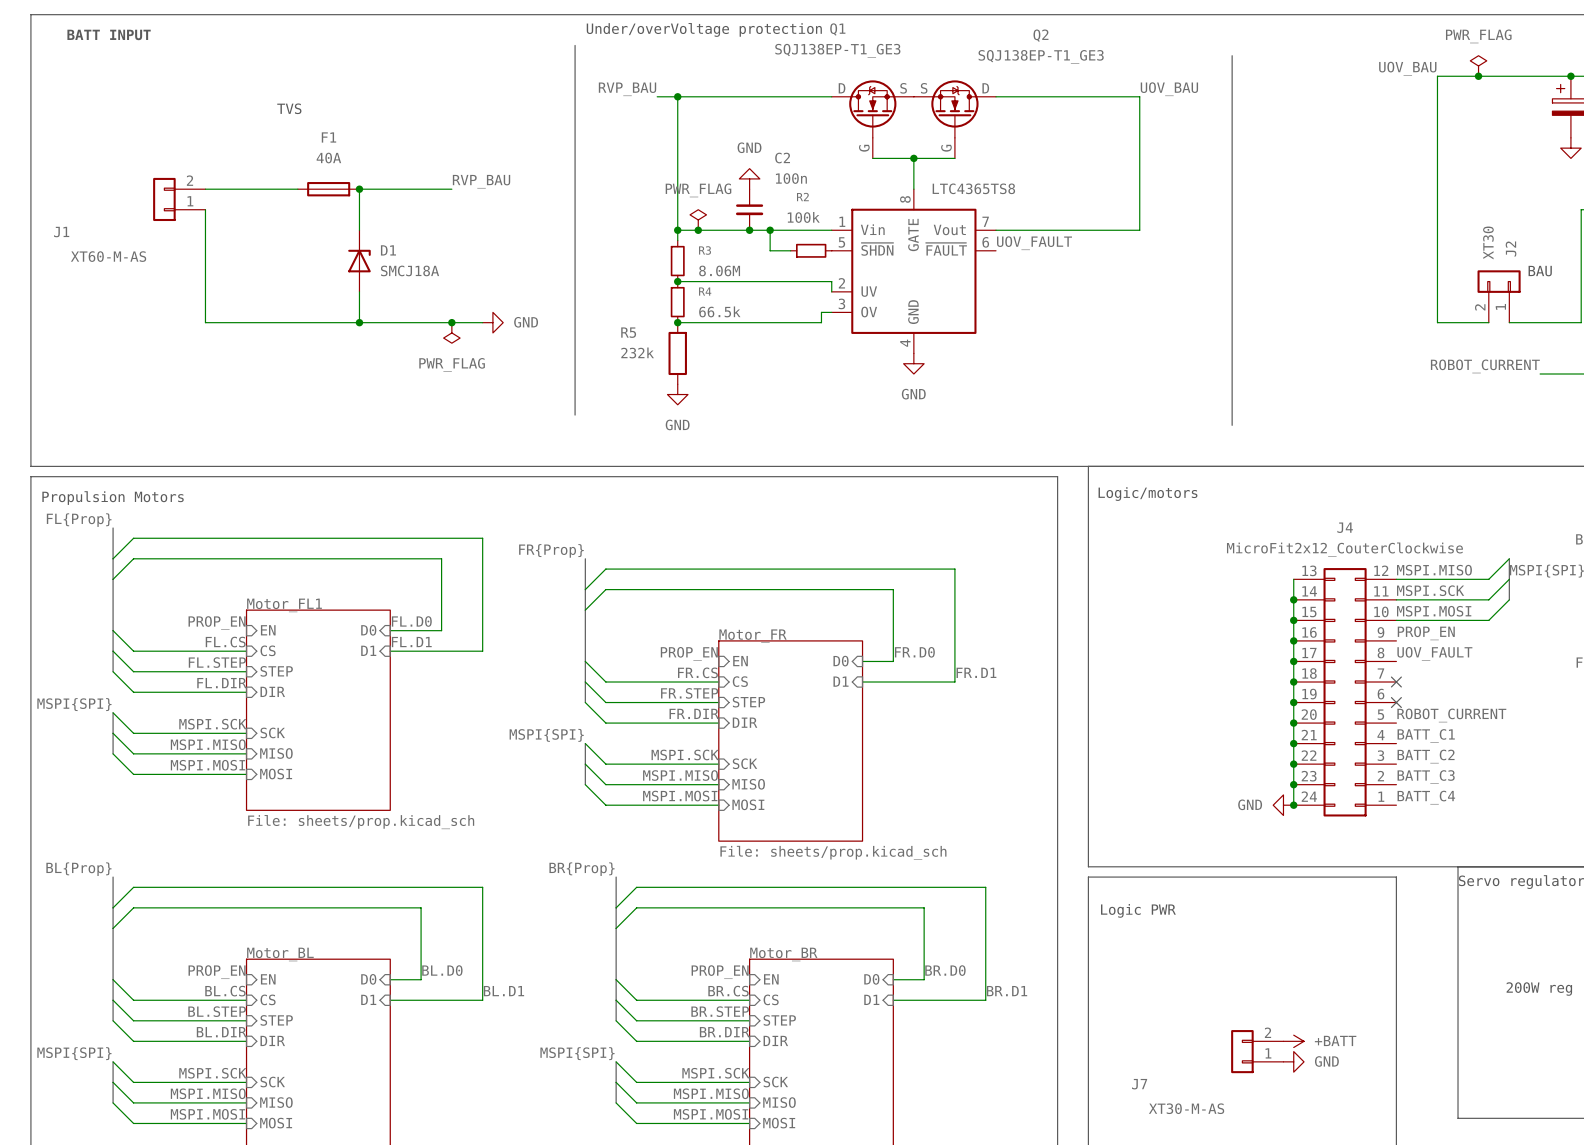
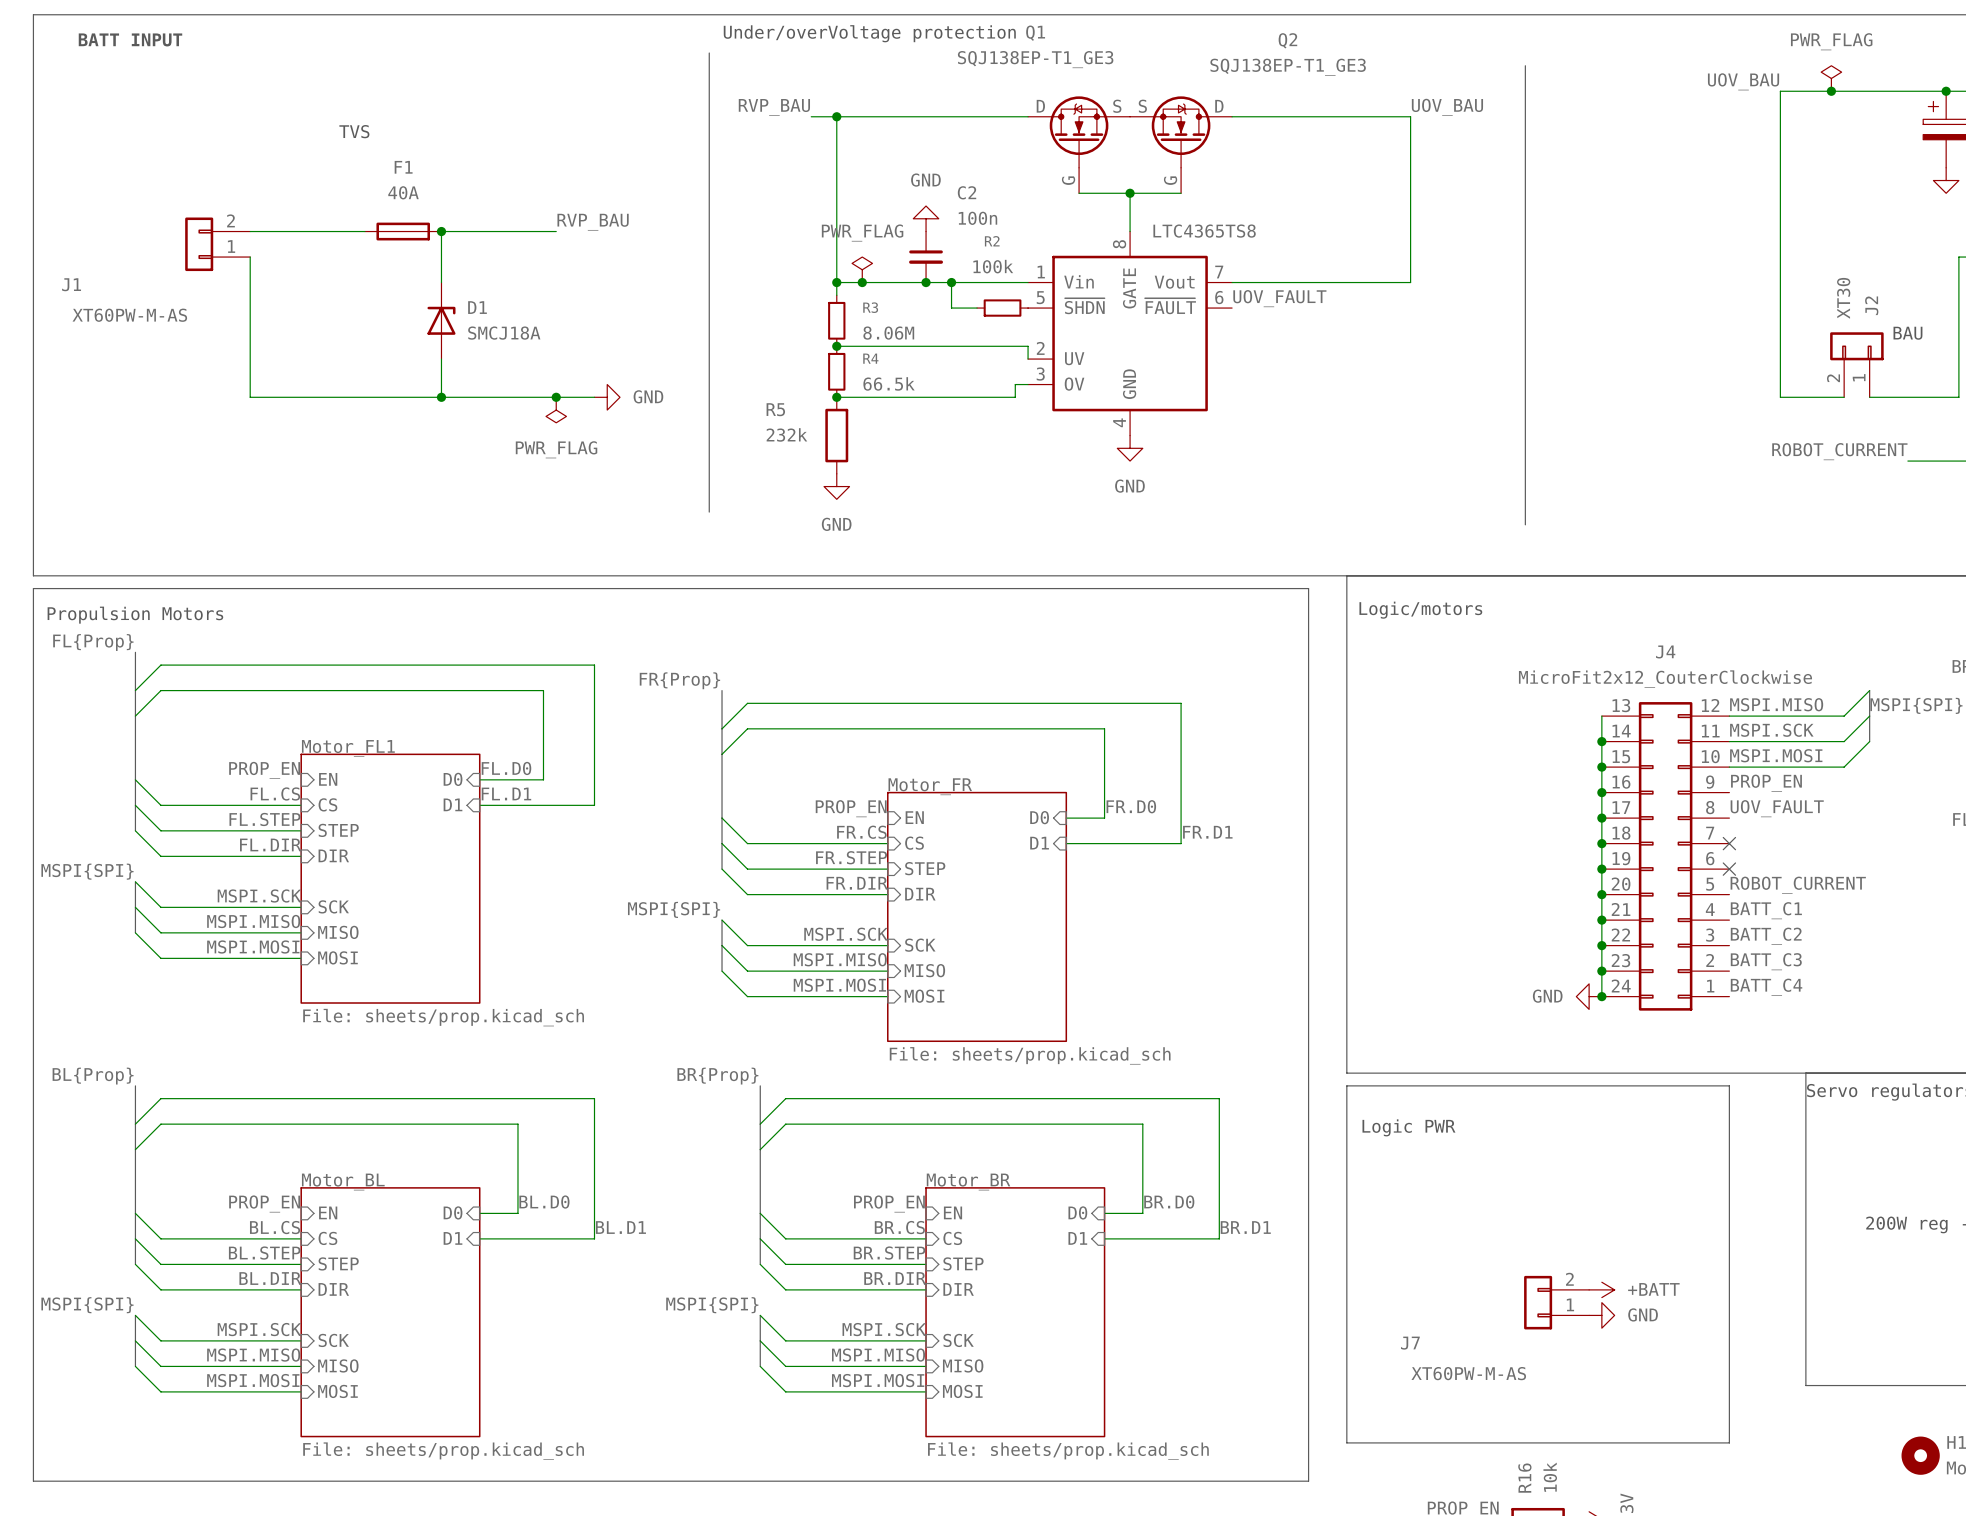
J1 value: XT60-M-AS (108, 256) -> XT60PW-M-AS (129, 315)
J7 value: XT30-M-AS (1186, 1108) -> XT60PW-M-AS (1468, 1373)

